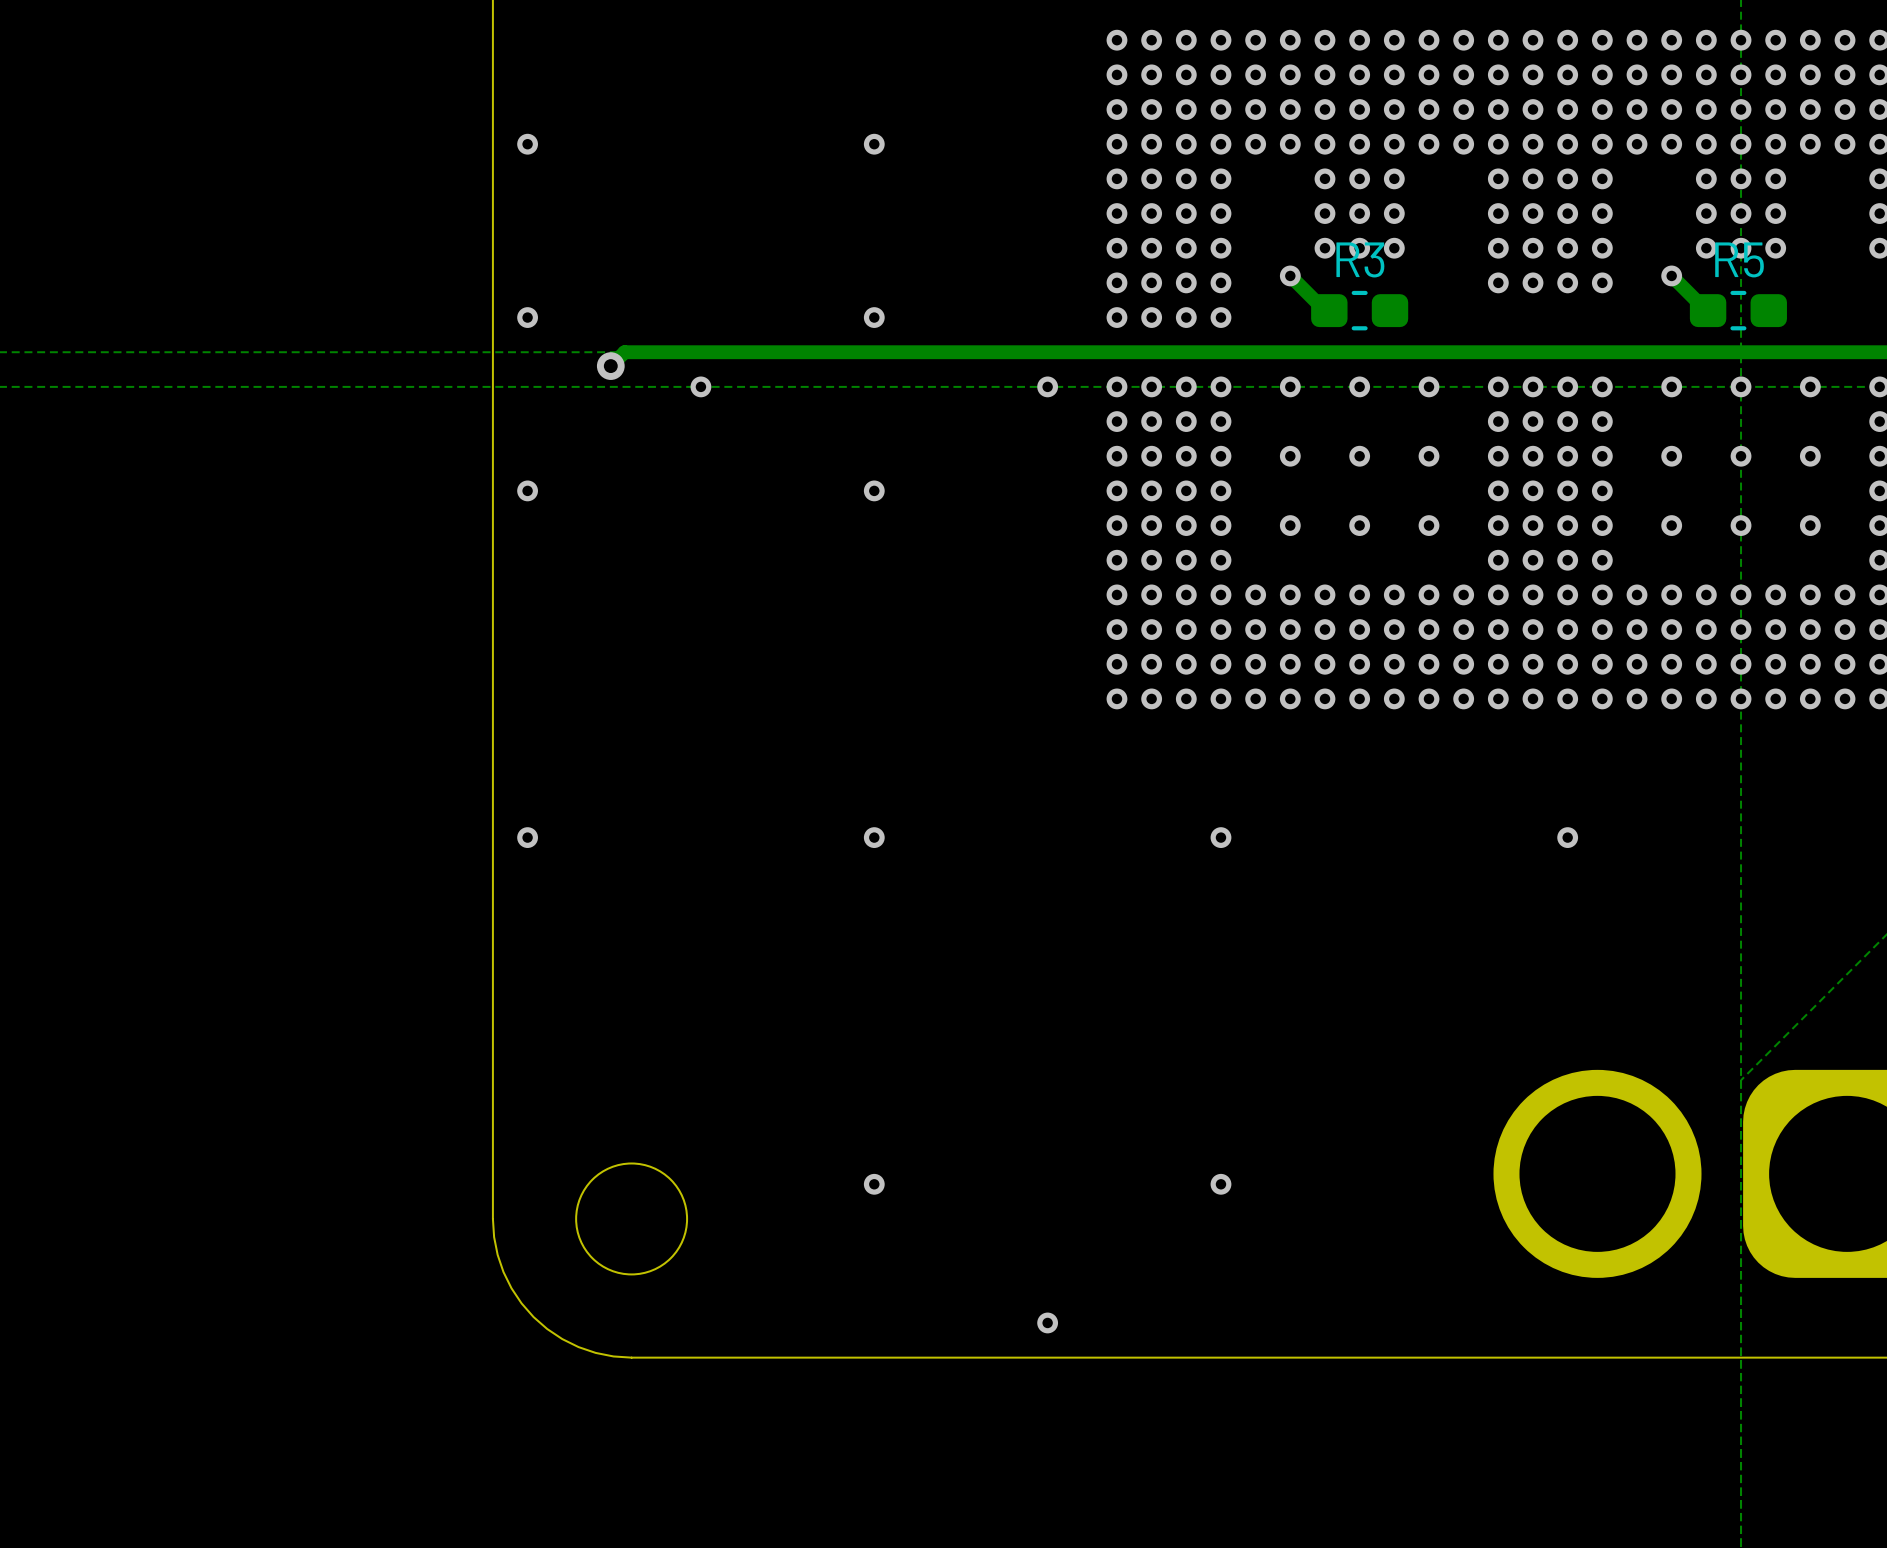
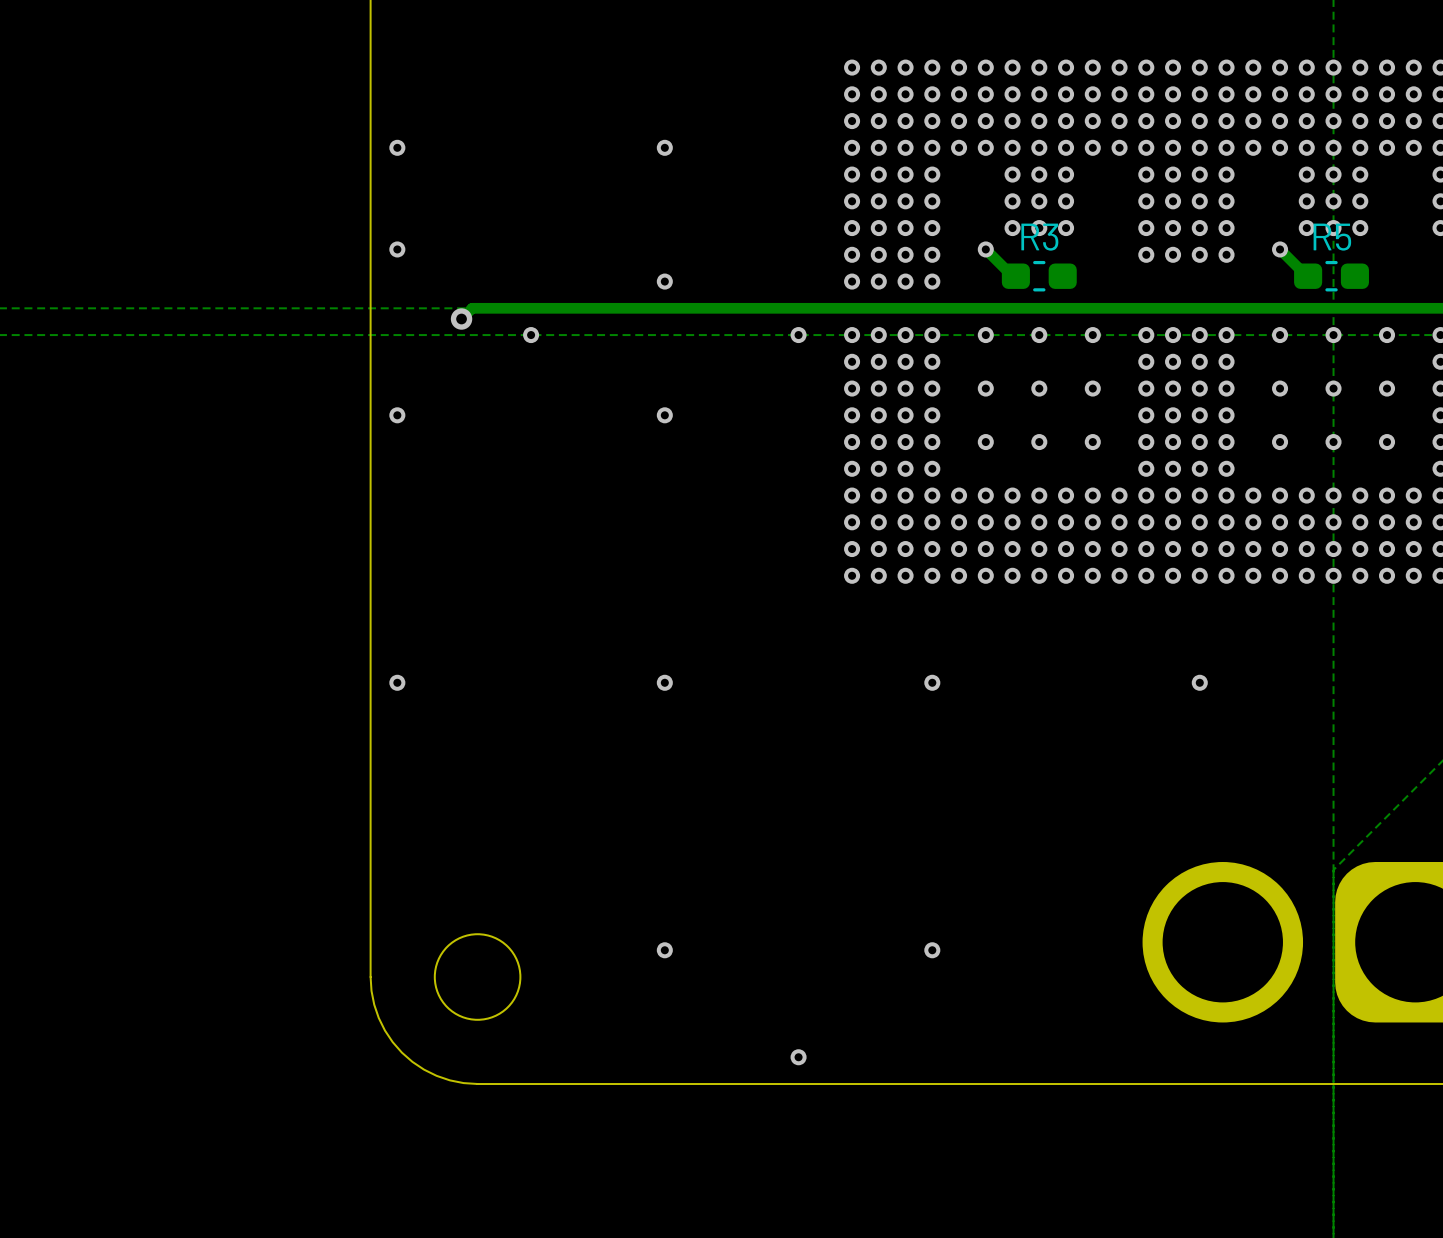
via position: (527, 317) -> (397, 249)

